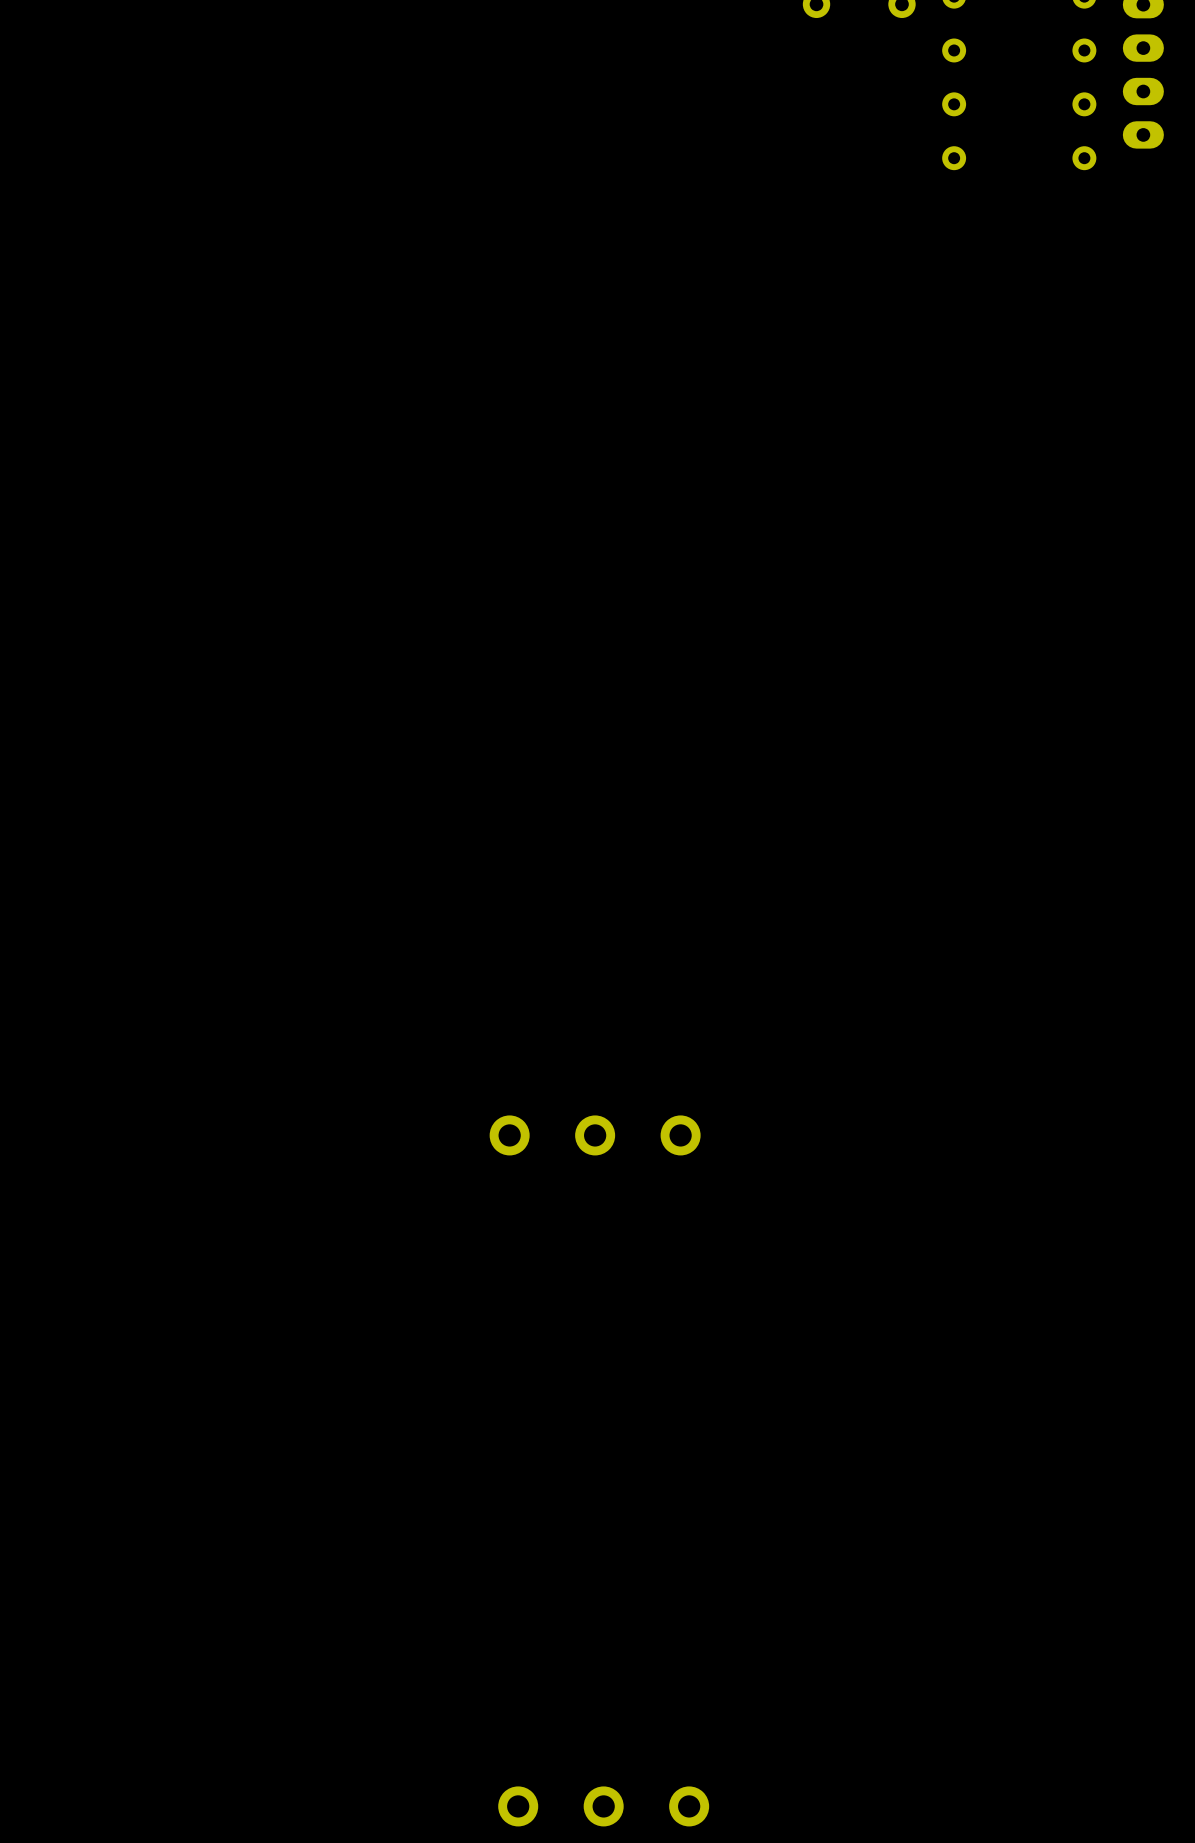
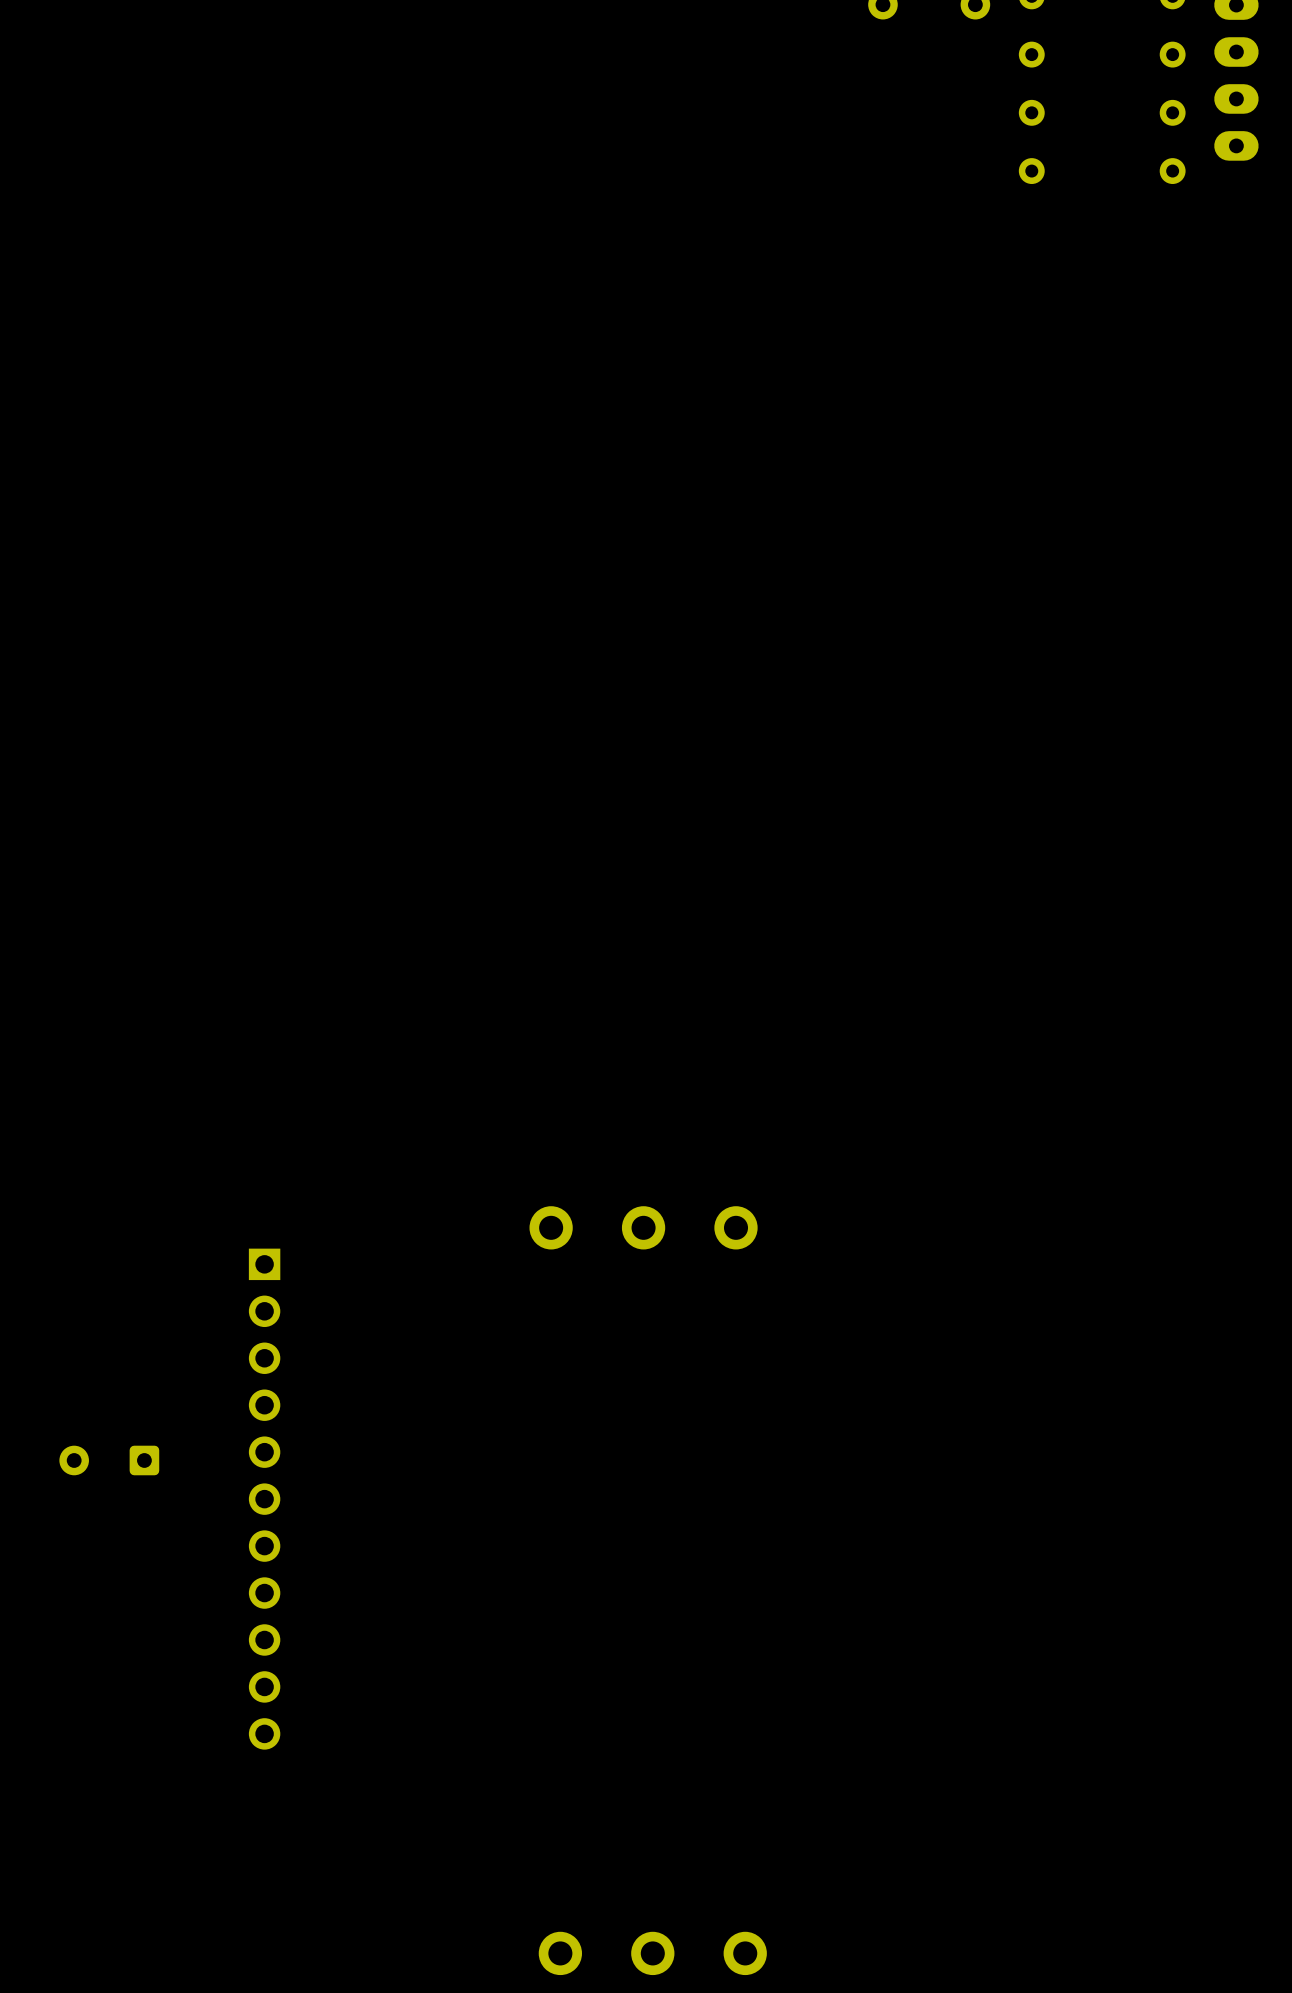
part: none -> (109, 1460)
part: none -> (264, 1499)

